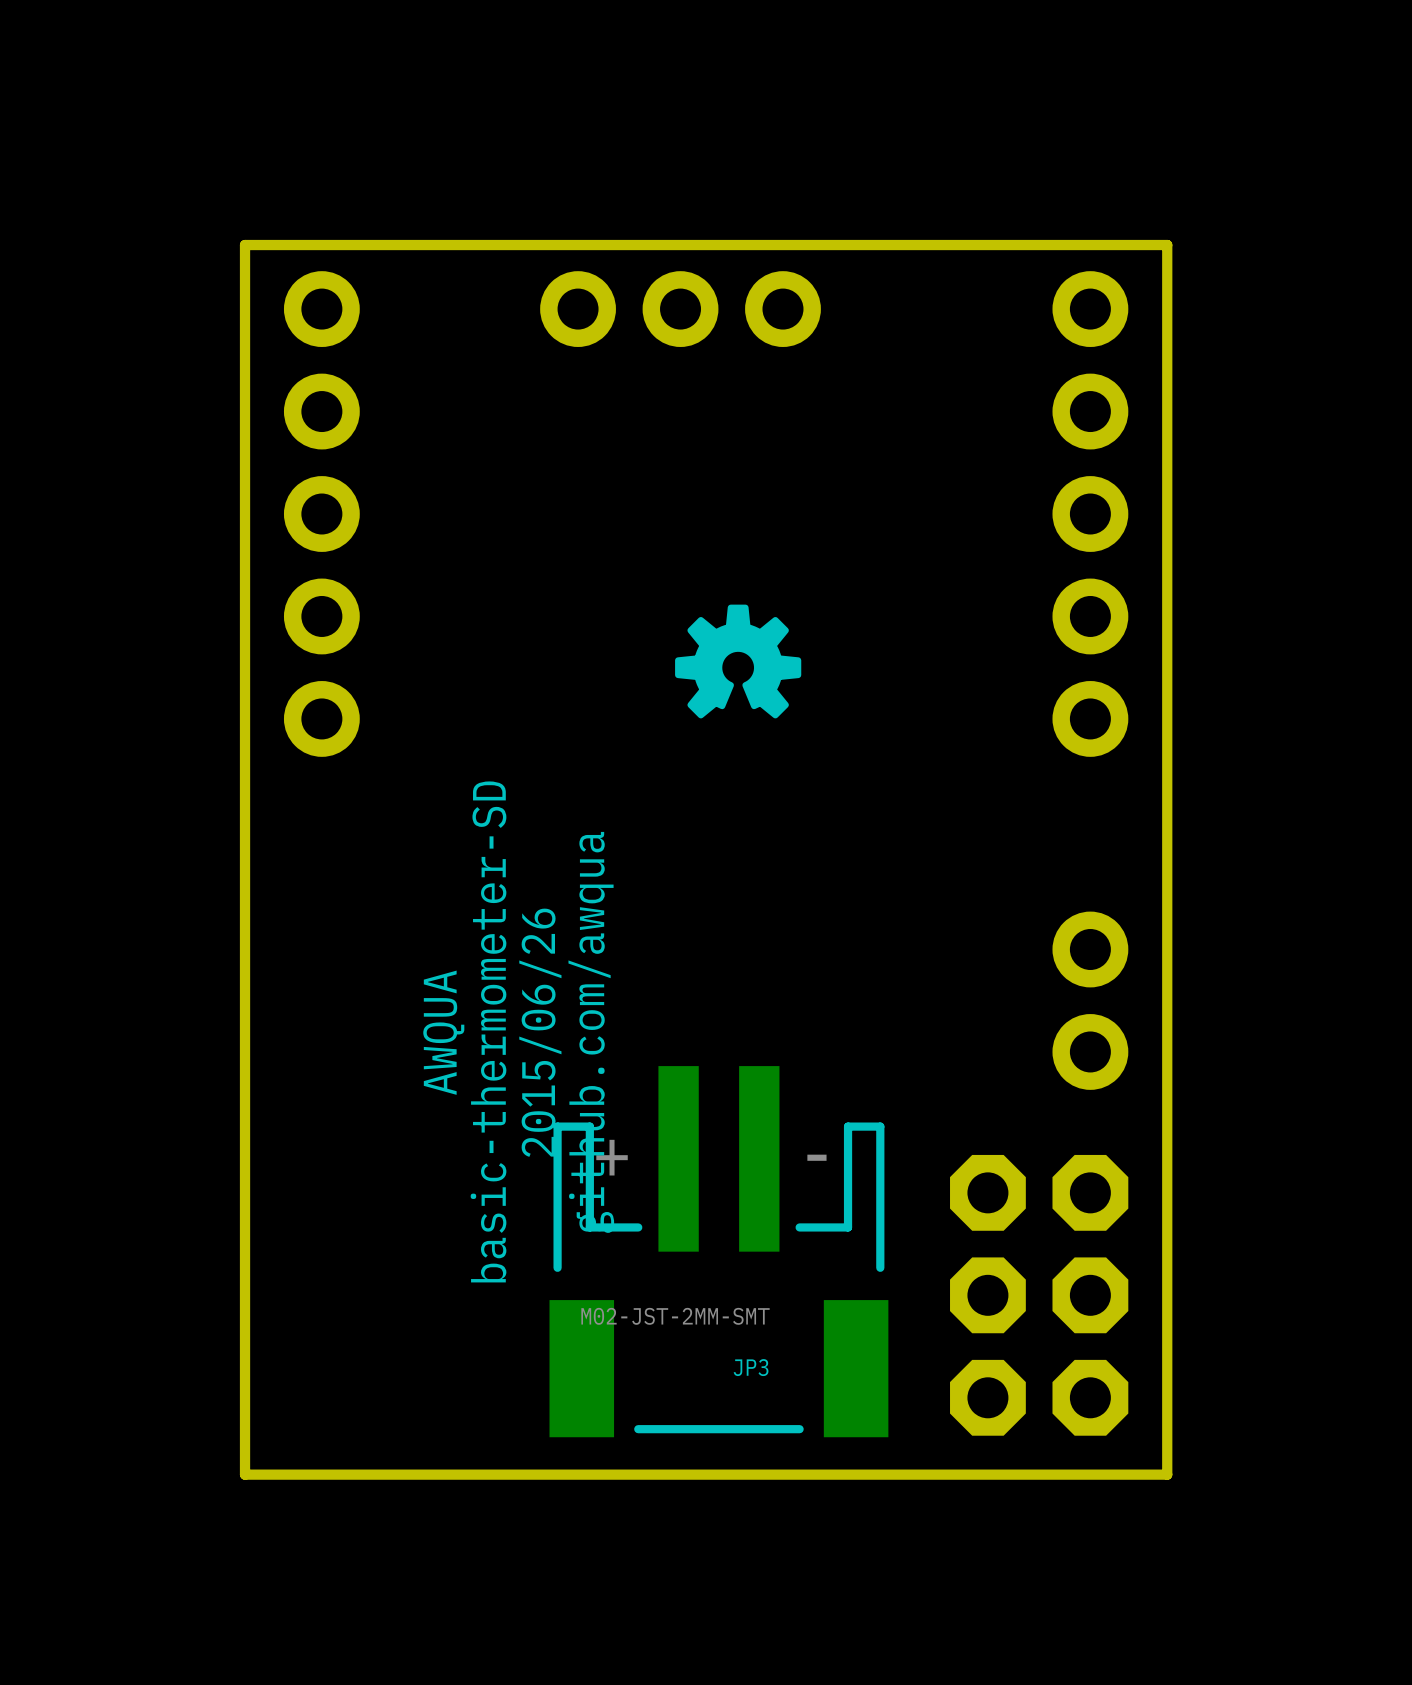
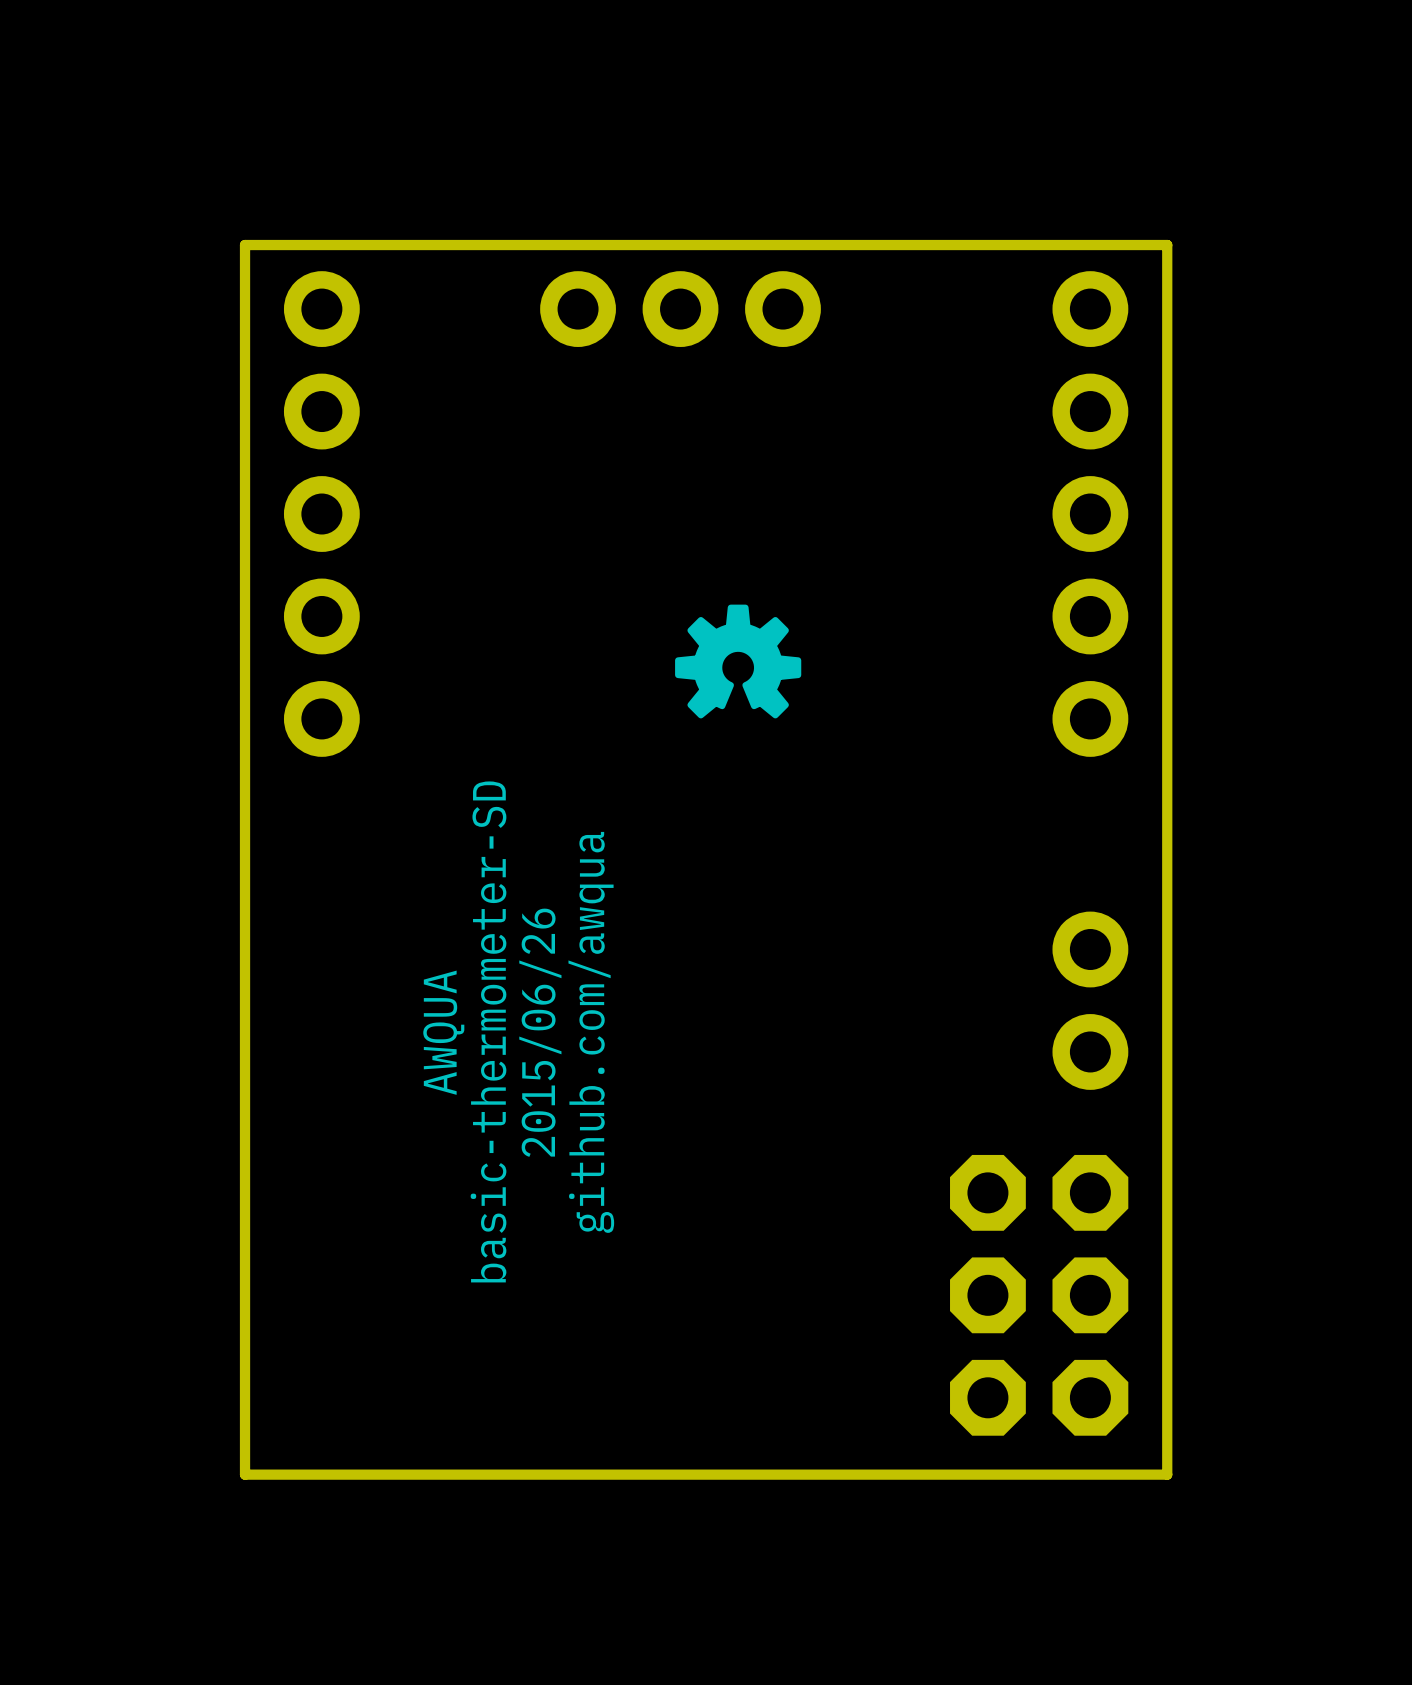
JP3: M02-JST-2MM-SMT (718, 1251) -> none

